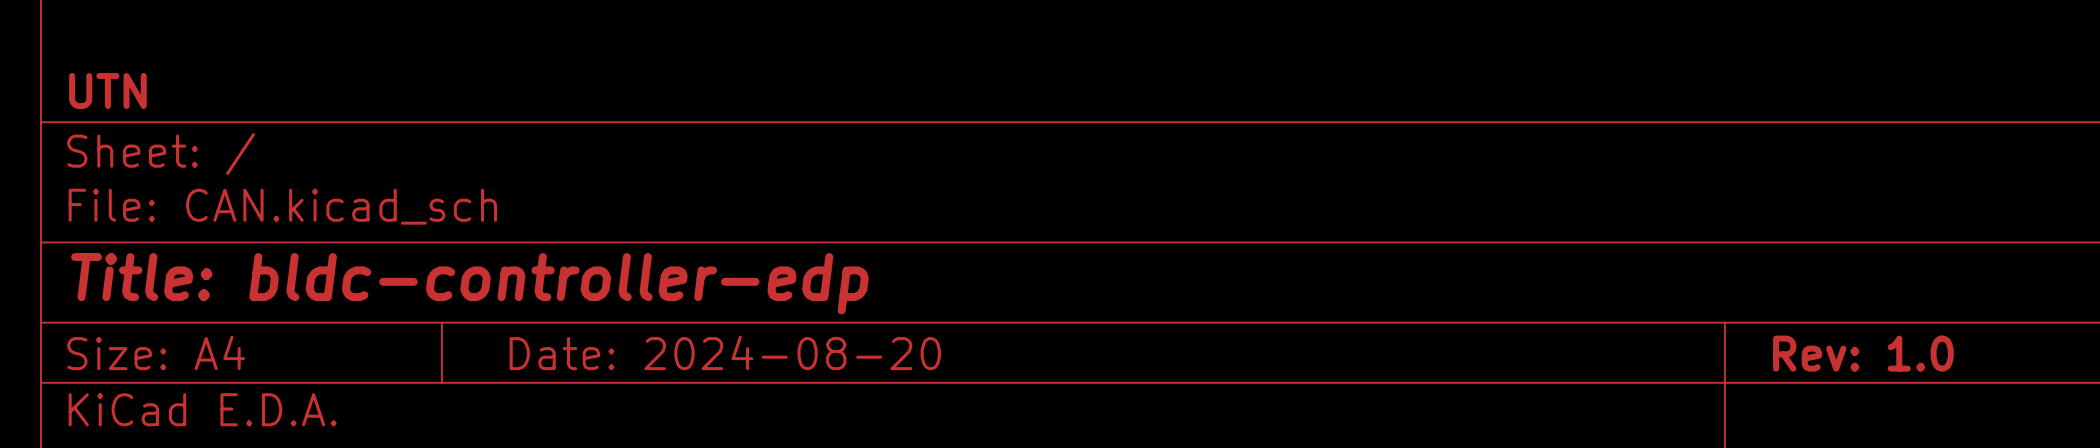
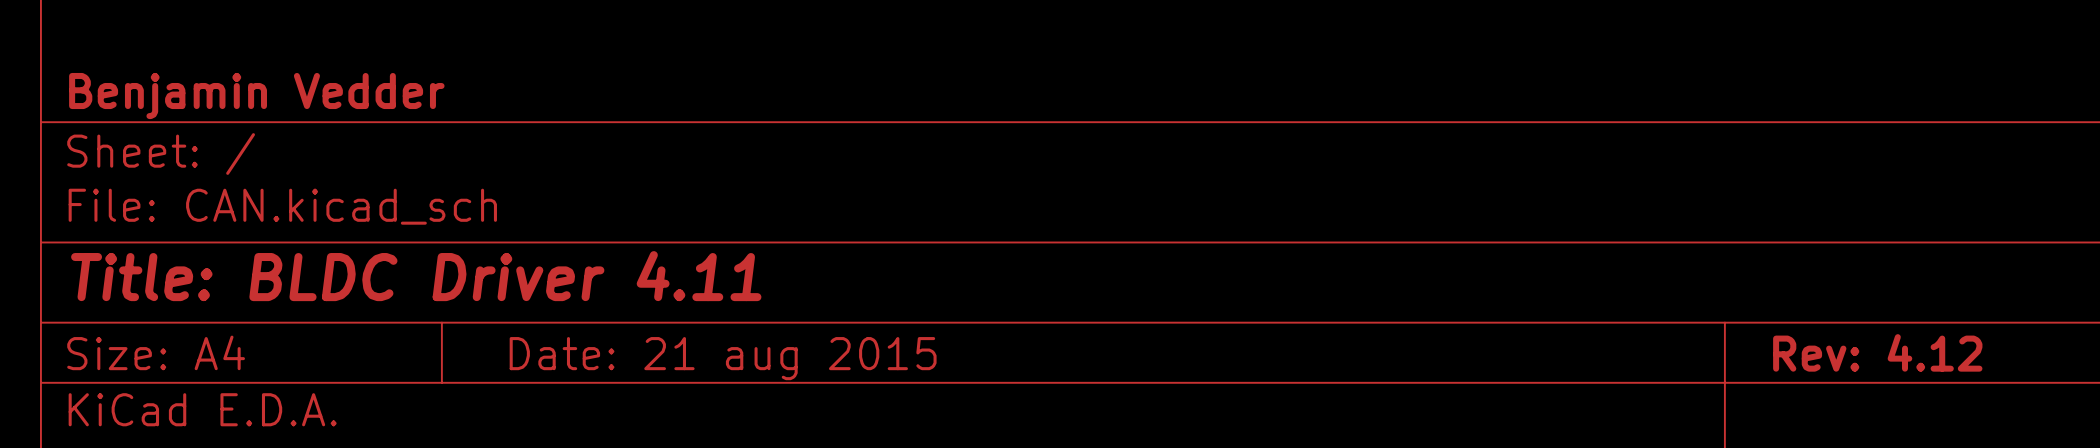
title block: UTN (107, 91) -> Benjamin Vedder (256, 96)
title block: Title: bldc-controller-edp (469, 283) -> Title: BLDC Driver 4.11 (416, 276)
title block: Date: 2024-08-20 (725, 352) -> Date: 21 aug 2015 (723, 358)
title block: Rev: 1.0 (1863, 353) -> Rev: 4.12 (1877, 352)

